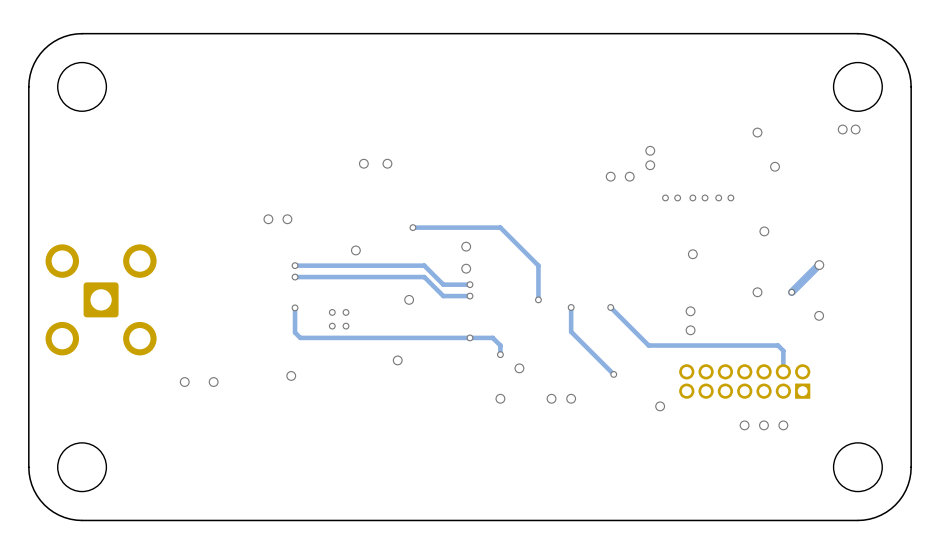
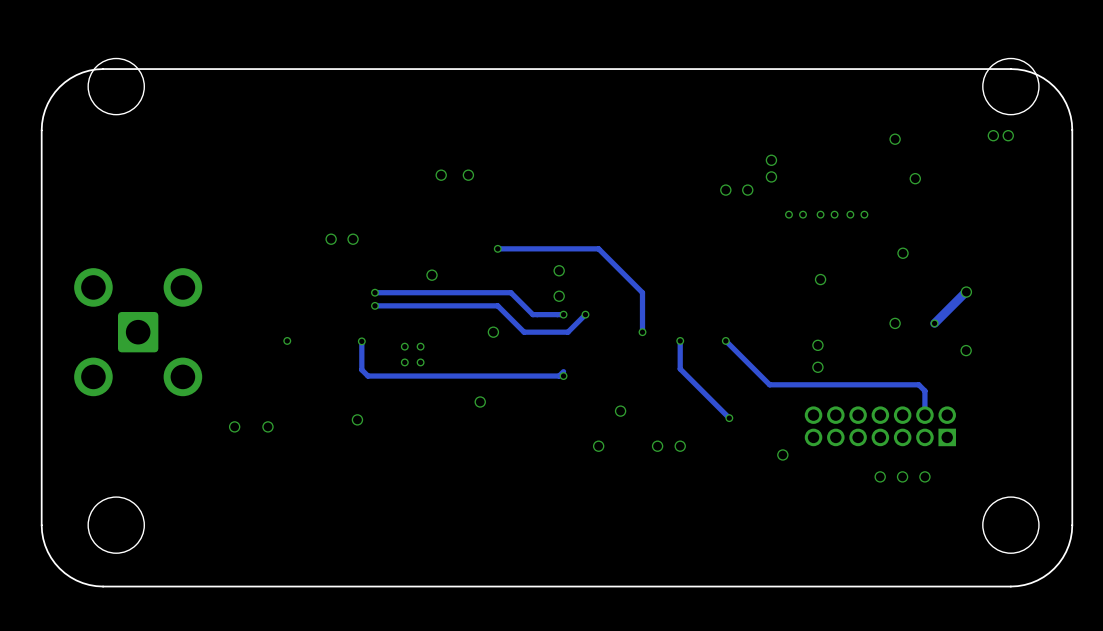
board edge: (911, 124) (910, 80) (905, 63) (899, 53) (886, 41) (863, 33) (82, 33) (58, 38) (40, 53) (34, 63) (29, 80) (28, 467) (34, 490) (44, 504) (64, 517) (82, 520) -> (1072, 130) (1068, 109) (1062, 97) (1054, 86) (1037, 74) (1017, 69) (103, 69) (89, 70) (76, 75) (64, 82) (55, 92) (47, 103) (42, 123) (42, 532) (47, 551) (55, 563) (64, 573) (76, 580) (89, 584) (116, 586)
via: (295, 265) -> none
track: (306, 265) (295, 265) -> none
via: none -> (374, 292)
via: (295, 277) -> none
track: (306, 277) (295, 277) -> none
via: none -> (374, 305)
track: (412, 277) (424, 277) (443, 296) (469, 296) -> (497, 305) (524, 332) (567, 332) (585, 314)
via position: (469, 296) -> (585, 314)
via: none -> (287, 340)
track: (466, 337) (492, 337) (500, 345) (500, 354) -> (559, 376) (563, 371)
via: (500, 354) -> none

